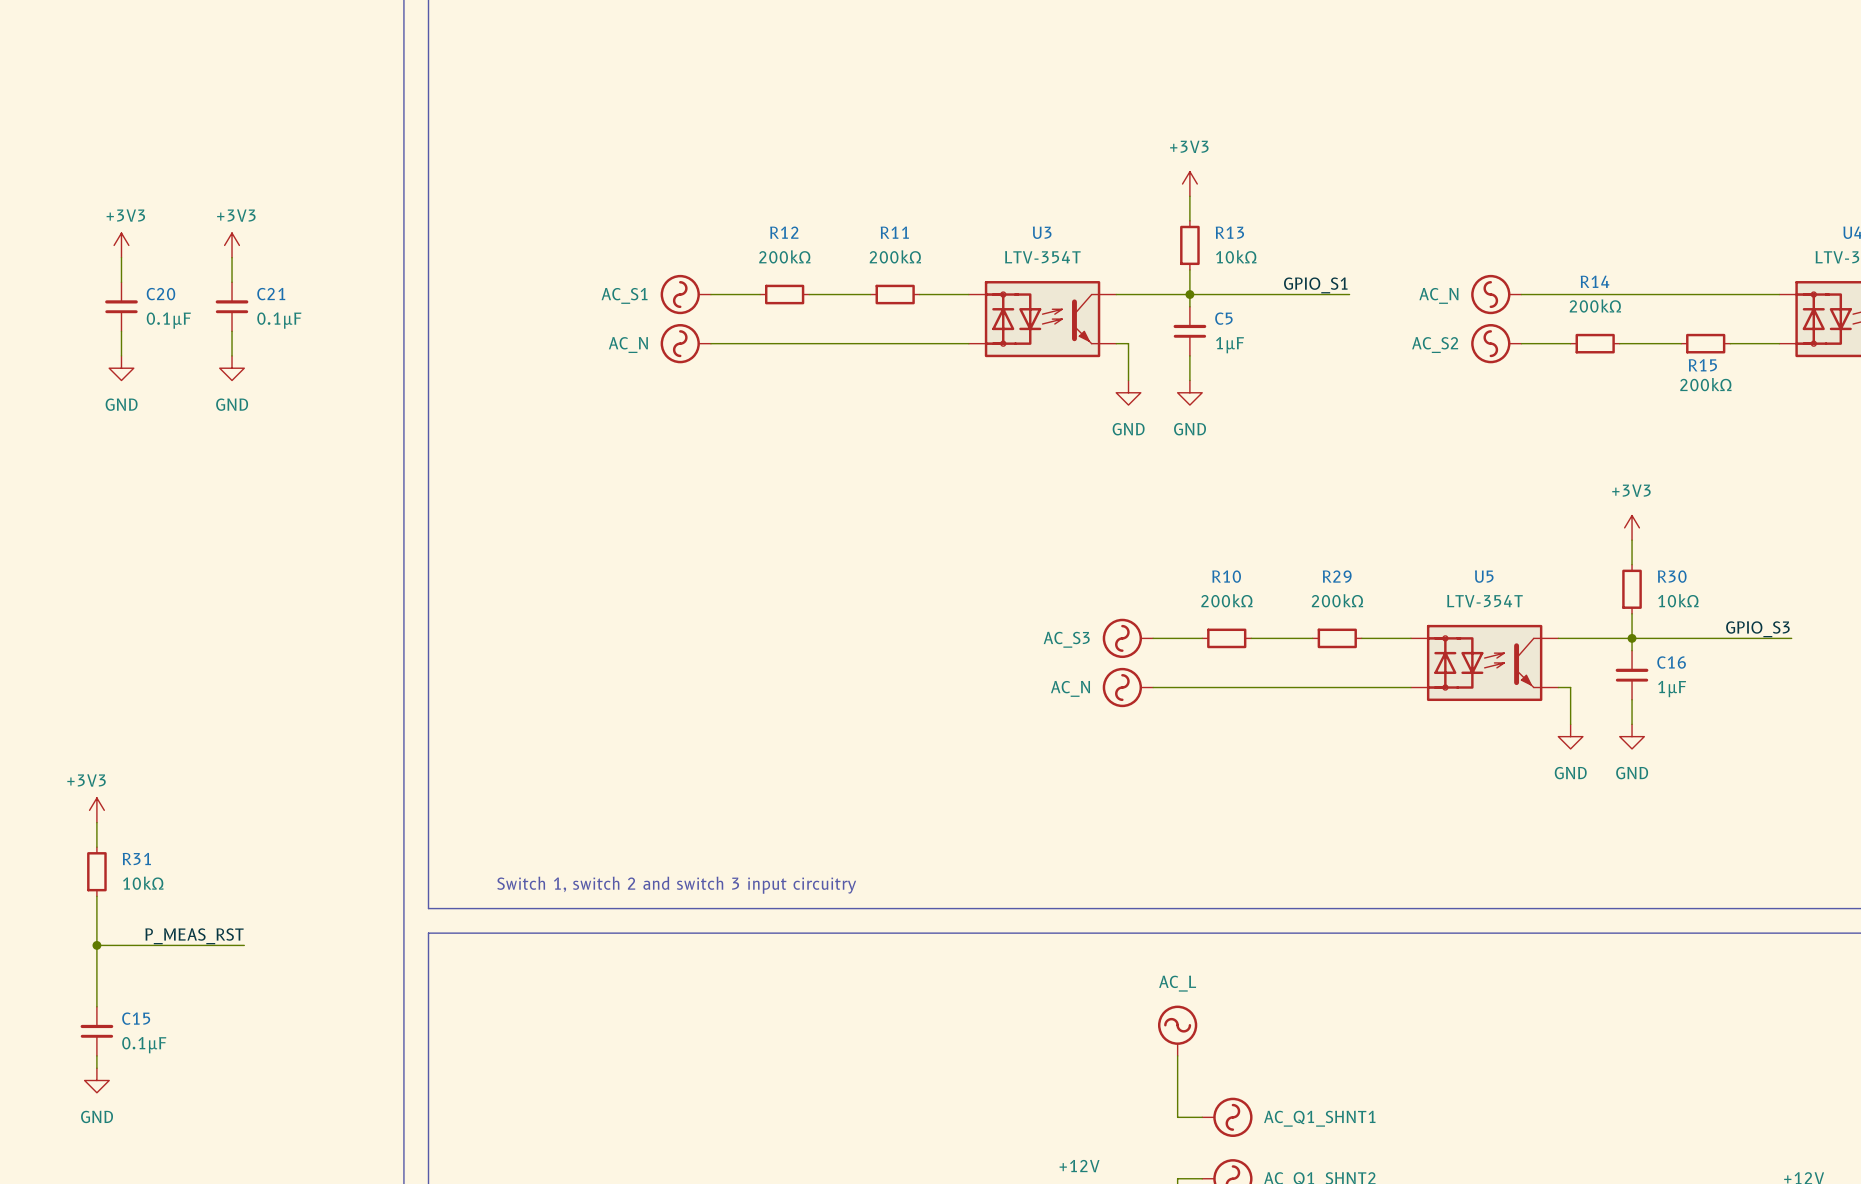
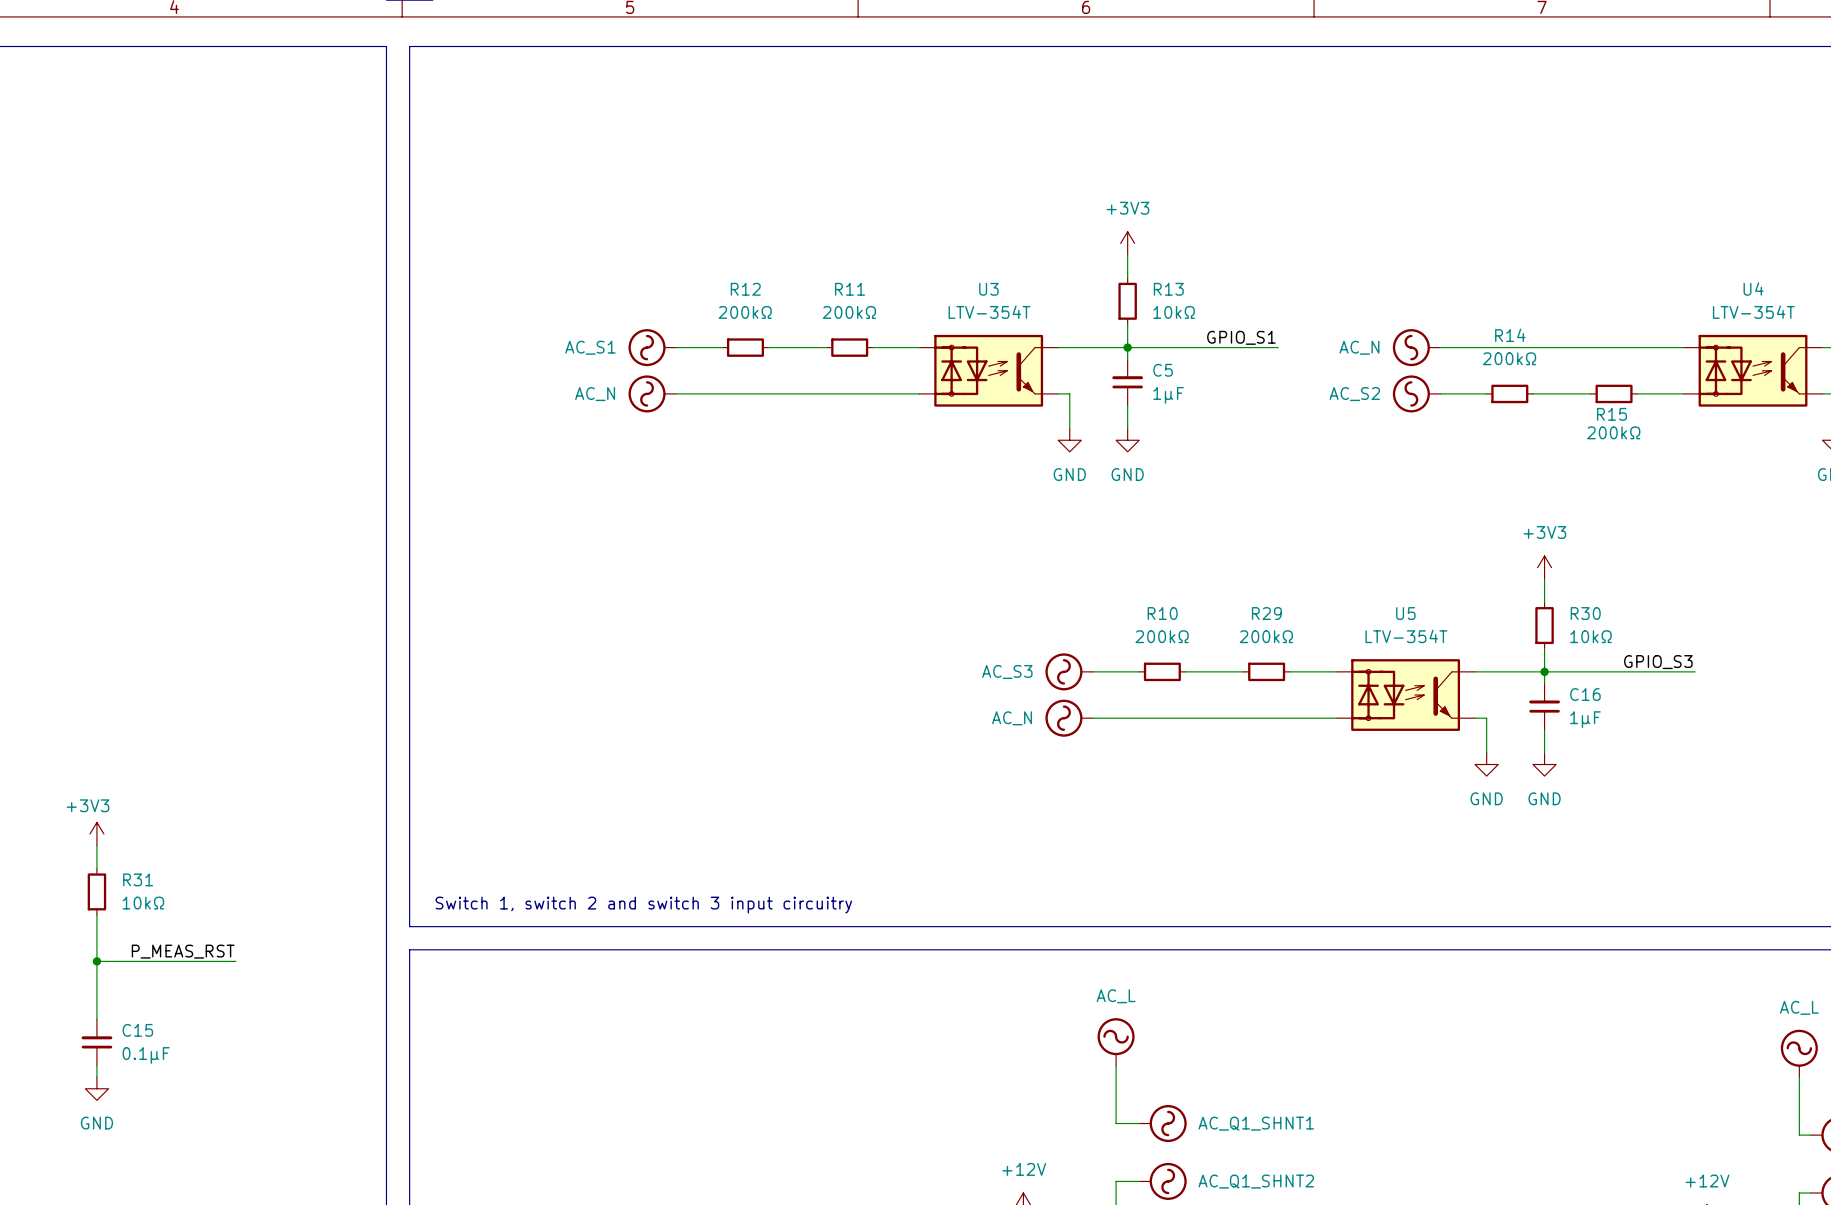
power symbol: +3V3 (121, 245) -> none
power symbol: +3V3 (232, 245) -> none
wire: (121, 257) (121, 282) -> none
wire: (232, 257) (232, 282) -> none
C20: (121, 306) -> none
C21: (232, 306) -> none
wire: (121, 331) (121, 355) -> none
wire: (232, 331) (232, 355) -> none
power symbol: GND (121, 368) -> none
power symbol: GND (232, 368) -> none

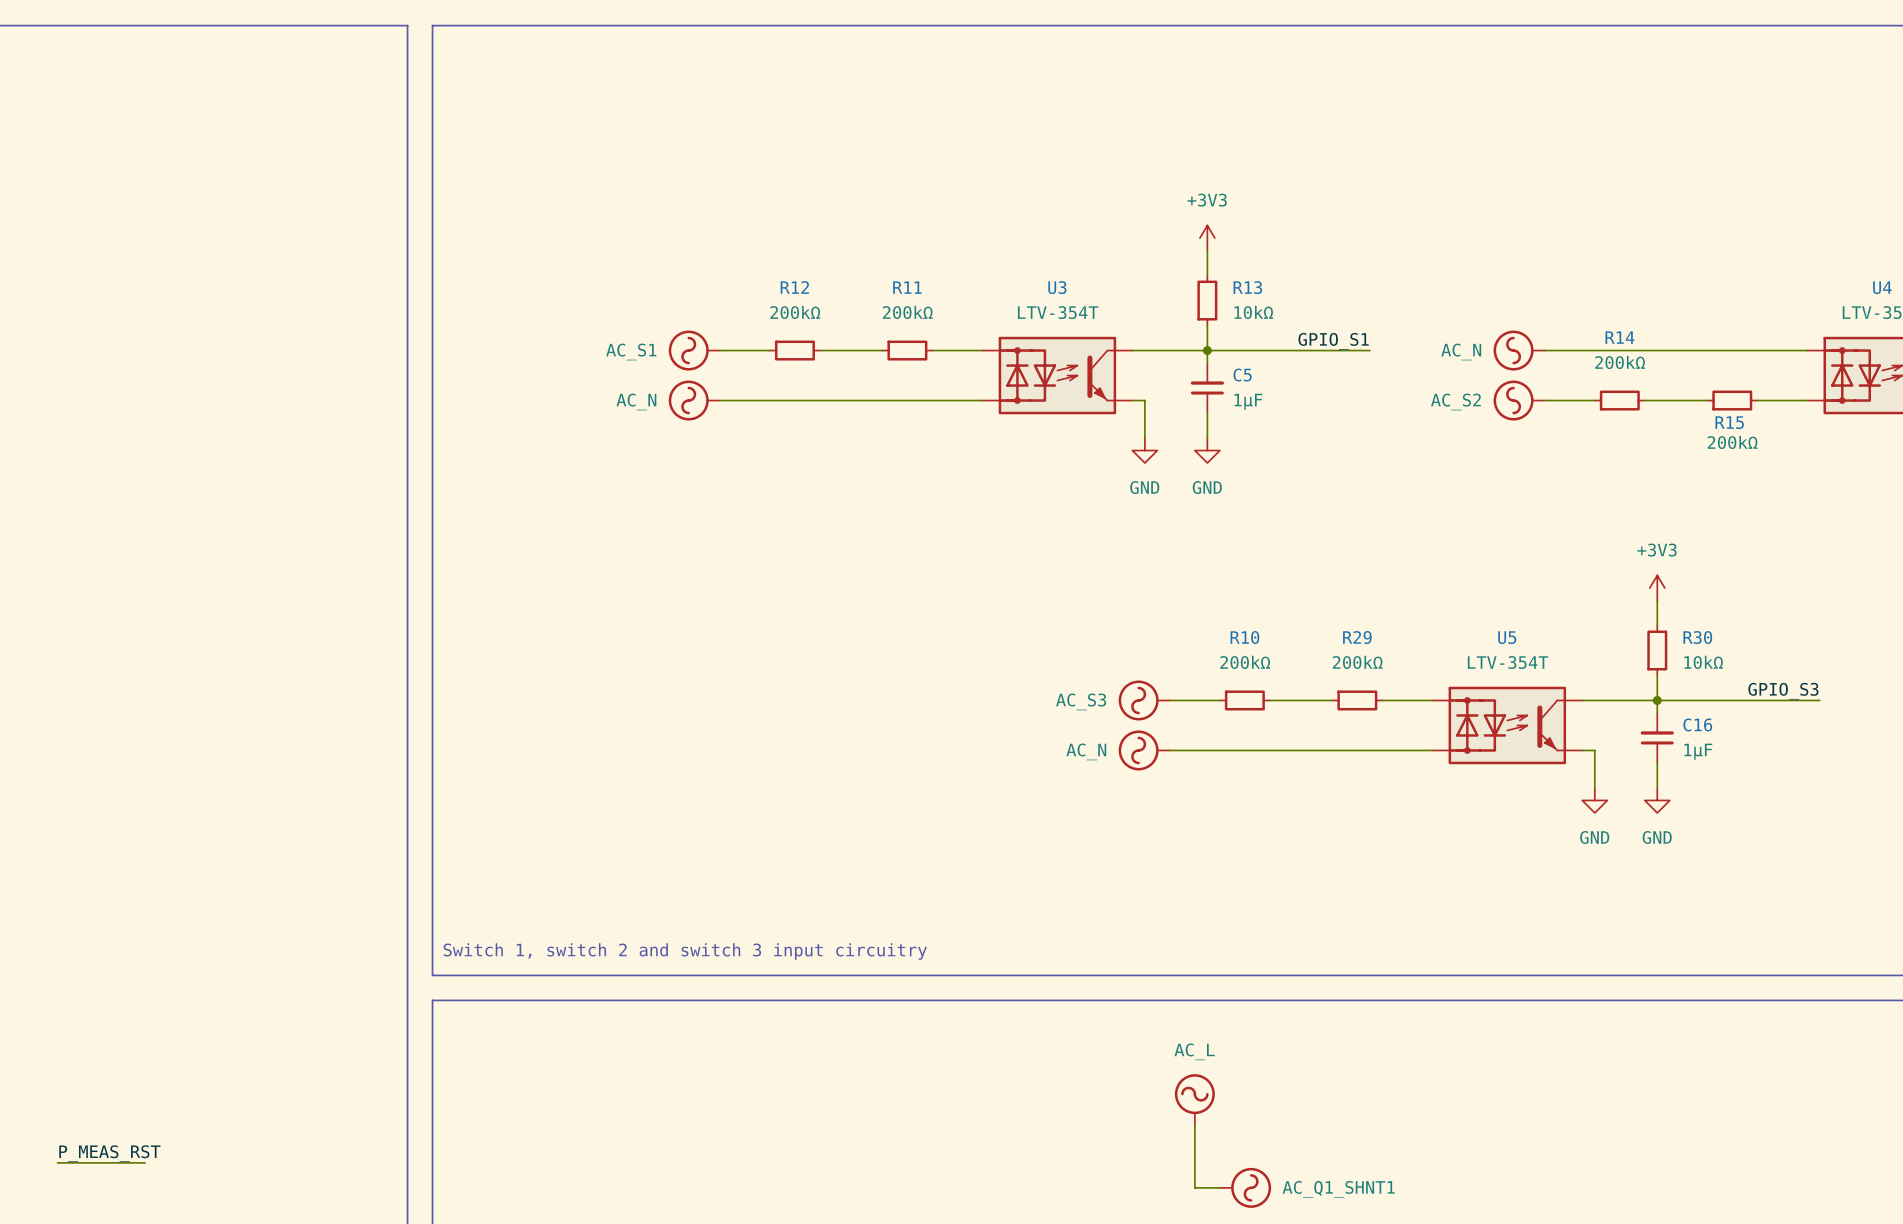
power symbol: +3V3 (96, 834) -> none
wire: (96, 845) (96, 868) -> none
R31: (96, 891) -> none
wire: (96, 915) (96, 1019) -> none
label position: P_MEAS_RST (183, 951) -> P_MEAS_RST (109, 1153)
wire: (96, 961) (235, 961) -> none
junction: (96, 961) -> none
C15: (96, 1042) -> none
wire: (96, 1065) (96, 1077) -> none
power symbol: GND (96, 1088) -> none
wire: none -> (57, 1162) (145, 1162)

